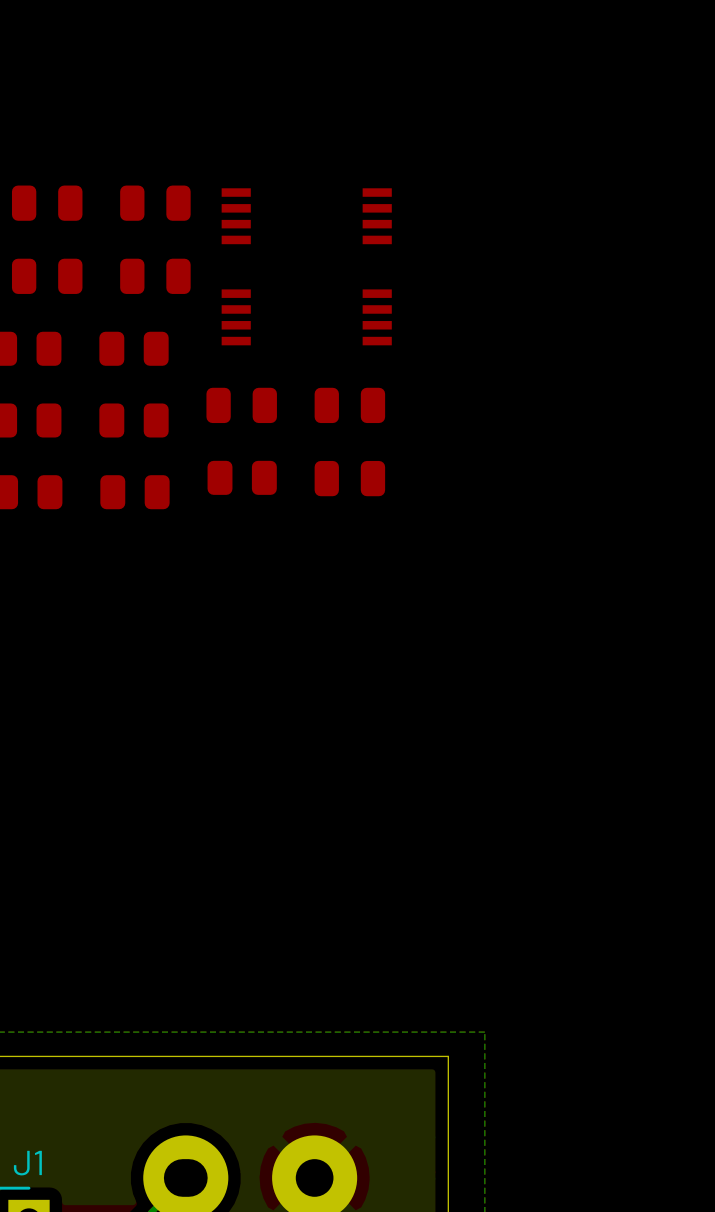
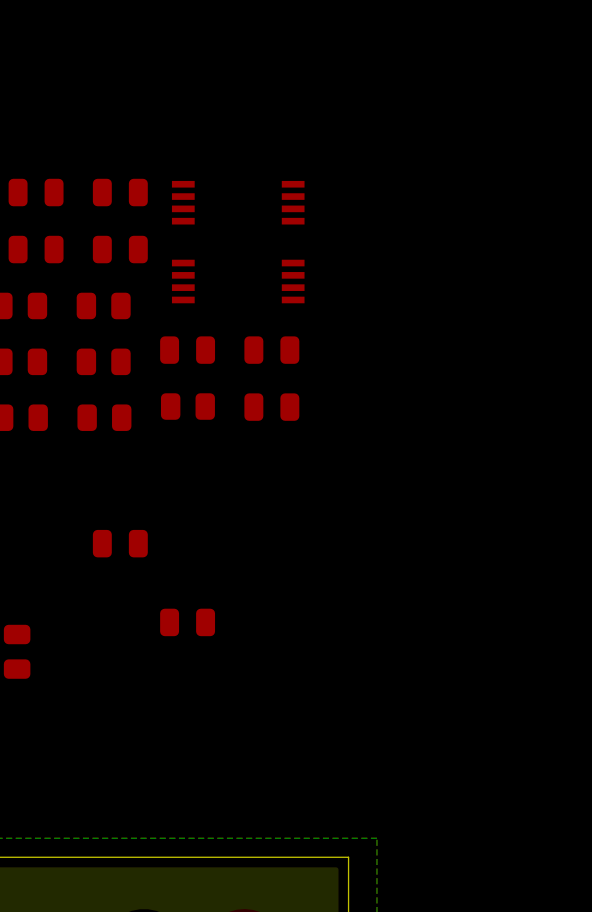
part: none -> (120, 543)
part: none -> (187, 622)
part: none -> (17, 651)

